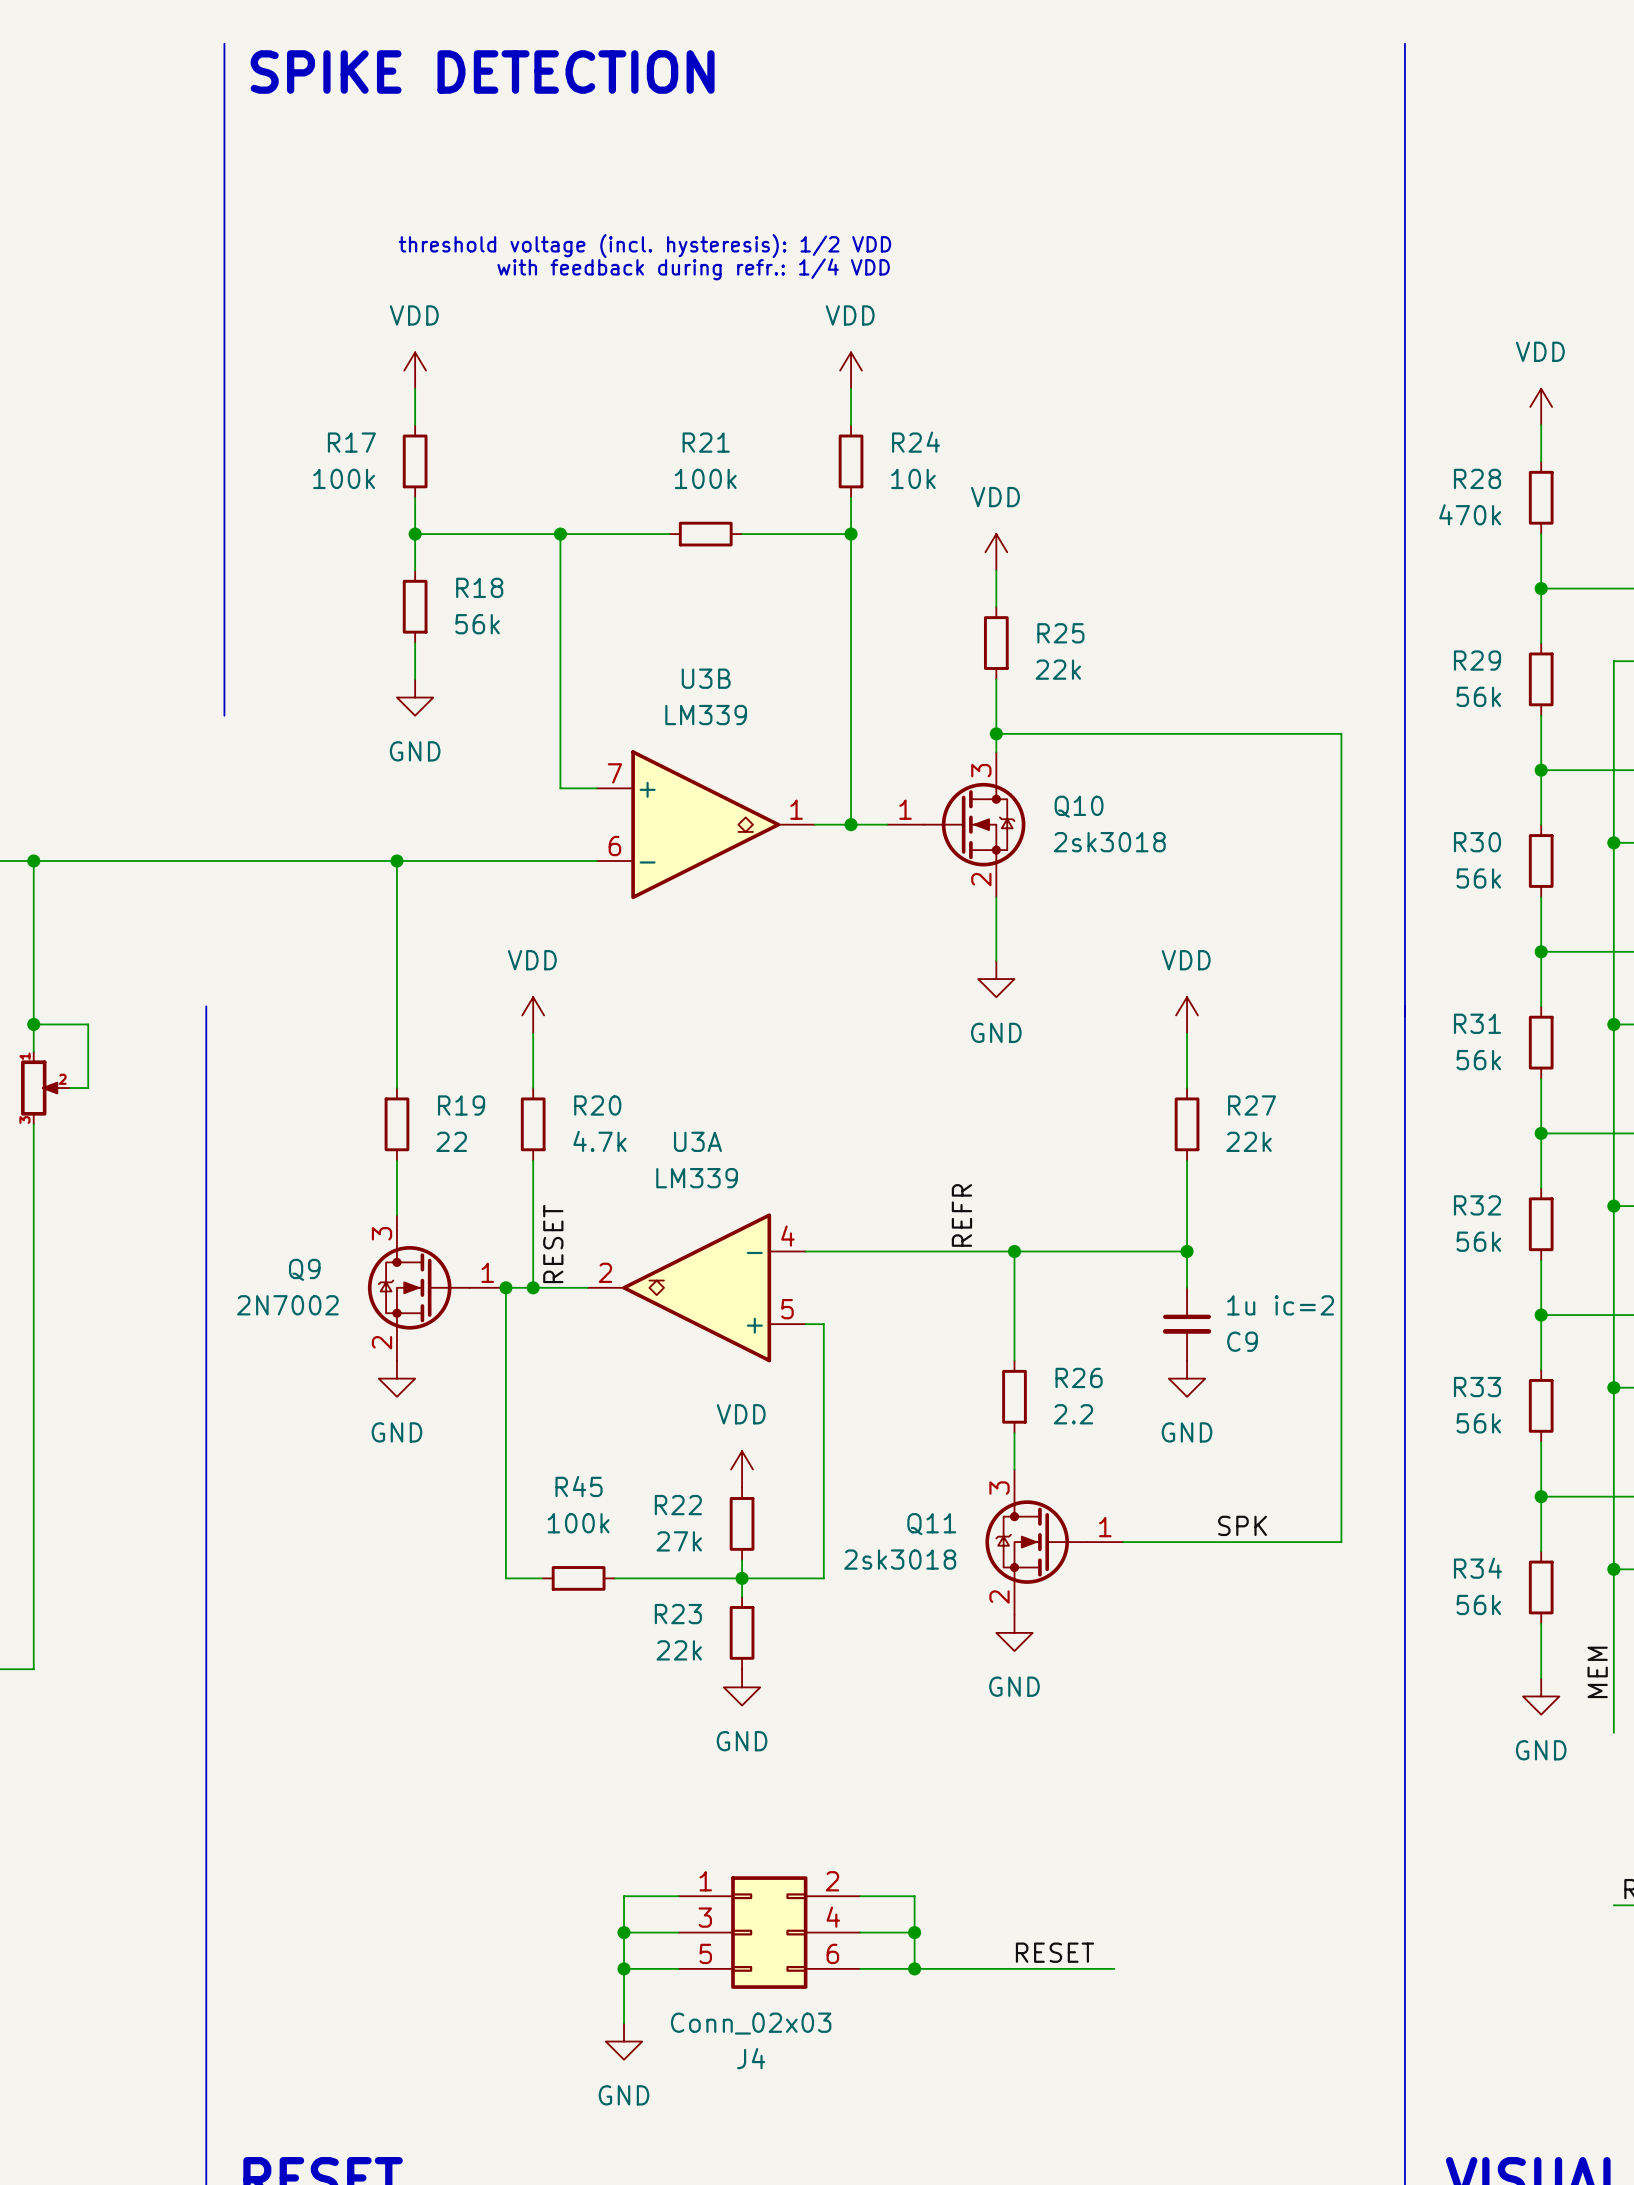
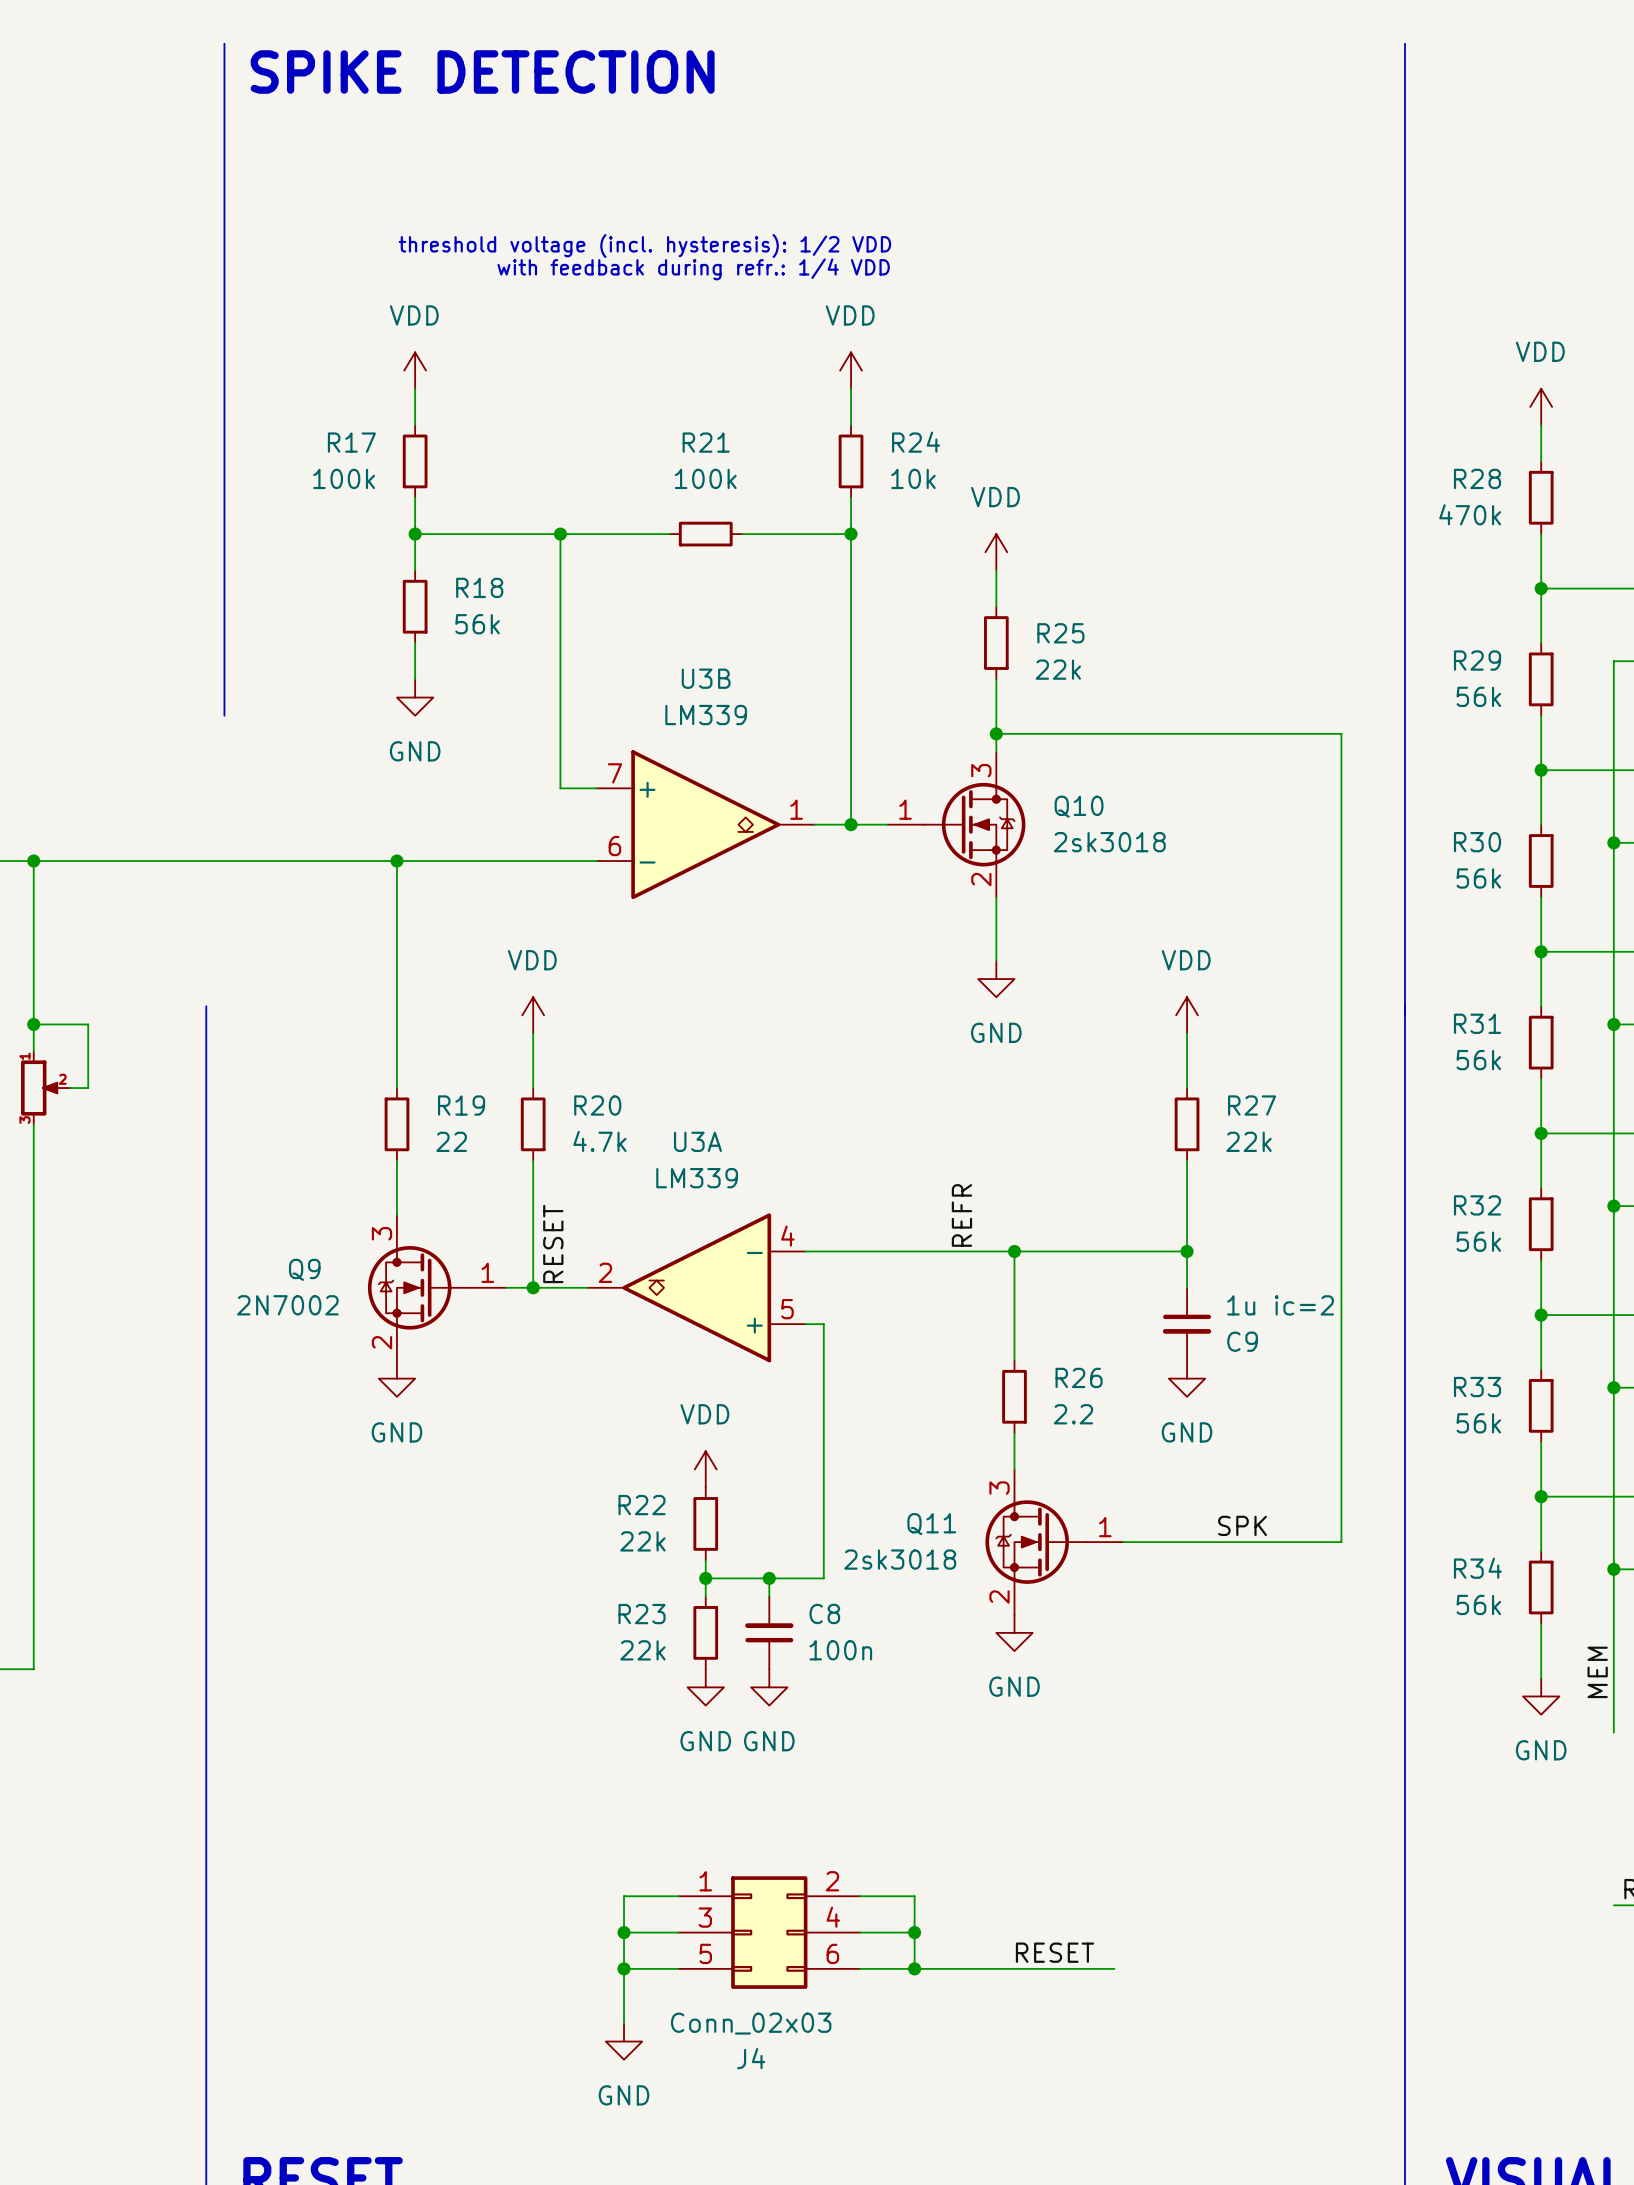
wire: (505, 1287) (505, 1578) (542, 1578) -> none
junction: (505, 1287) -> none
power symbol position: VDD (742, 1469) -> VDD (705, 1469)
R22 position: (742, 1523) -> (705, 1523)
R22 value: 27k (679, 1541) -> 22k (642, 1541)
wire: (742, 1560) (742, 1596) -> (705, 1560) (705, 1596)
R45: 100k (578, 1578) -> none
wire: (614, 1578) (705, 1578) -> none
junction: none -> (705, 1578)
junction: (742, 1578) -> none
wire: none -> (769, 1578) (769, 1596)
junction: none -> (769, 1578)
R23 position: (742, 1632) -> (705, 1632)
C8: none -> 100n (769, 1632)
power symbol: none -> GND (705, 1687)
power symbol: GND (742, 1687) -> none
power symbol: none -> GND (769, 1687)

